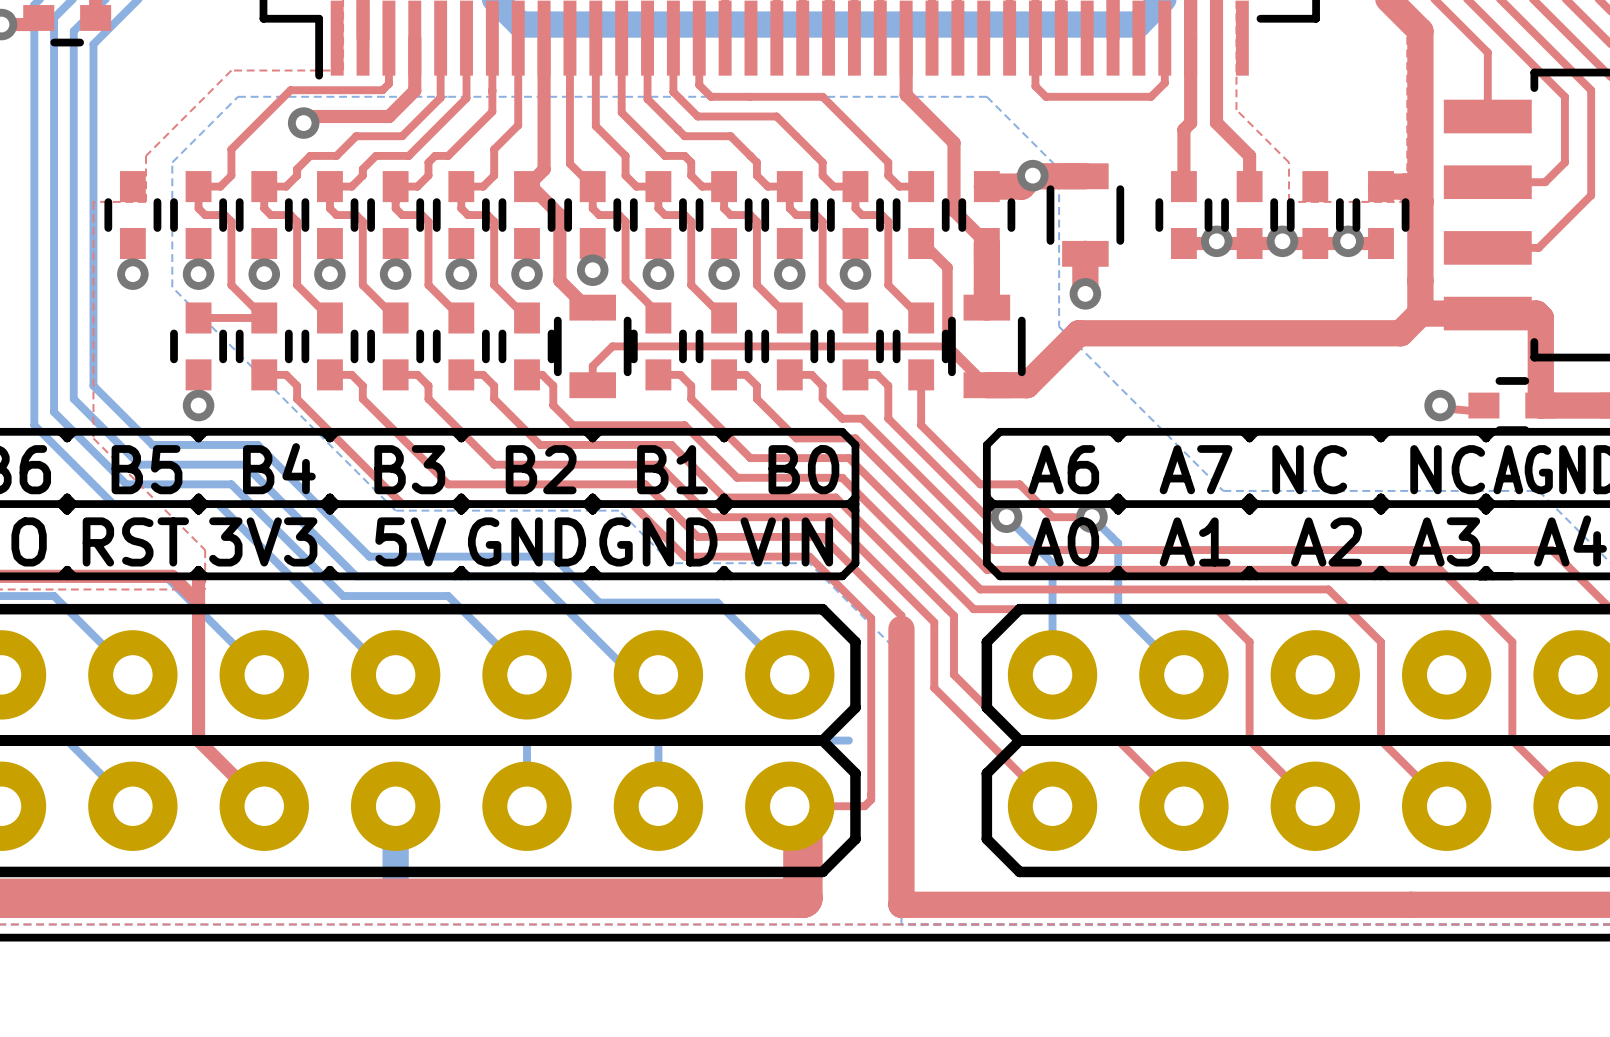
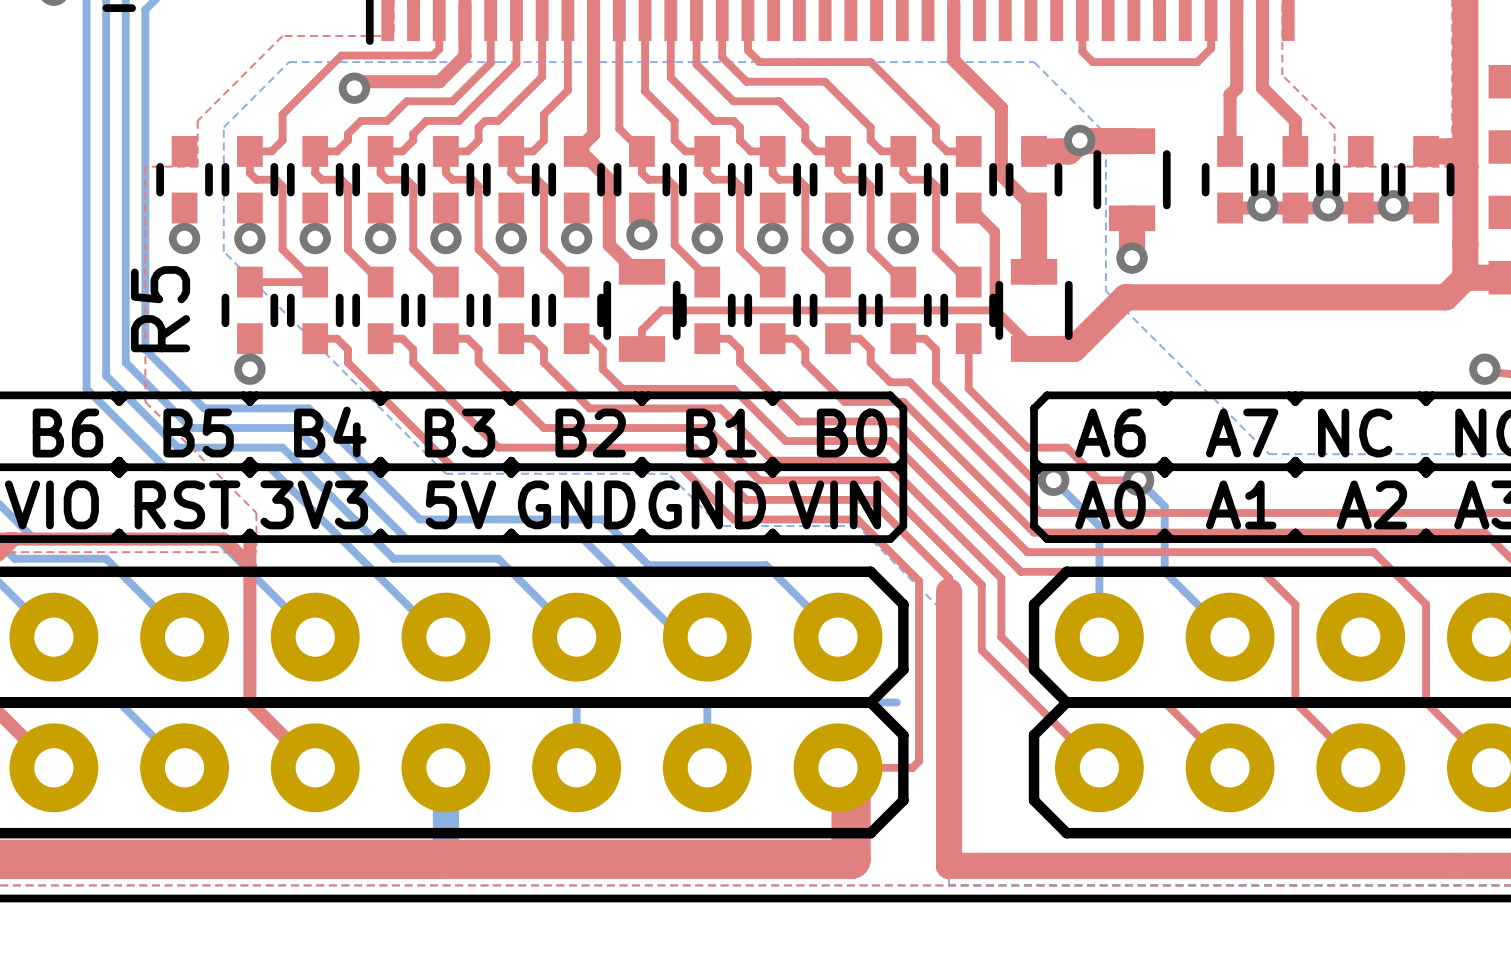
R5 name: none -> R5 (160, 309)

